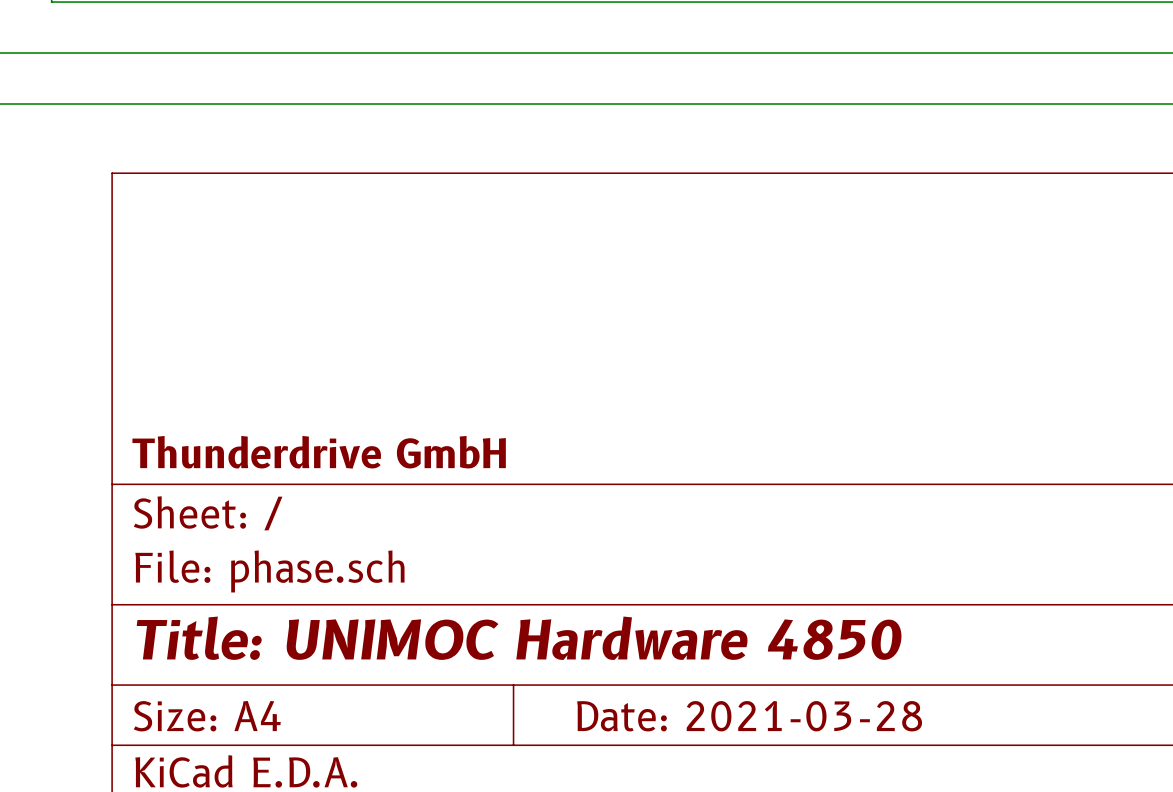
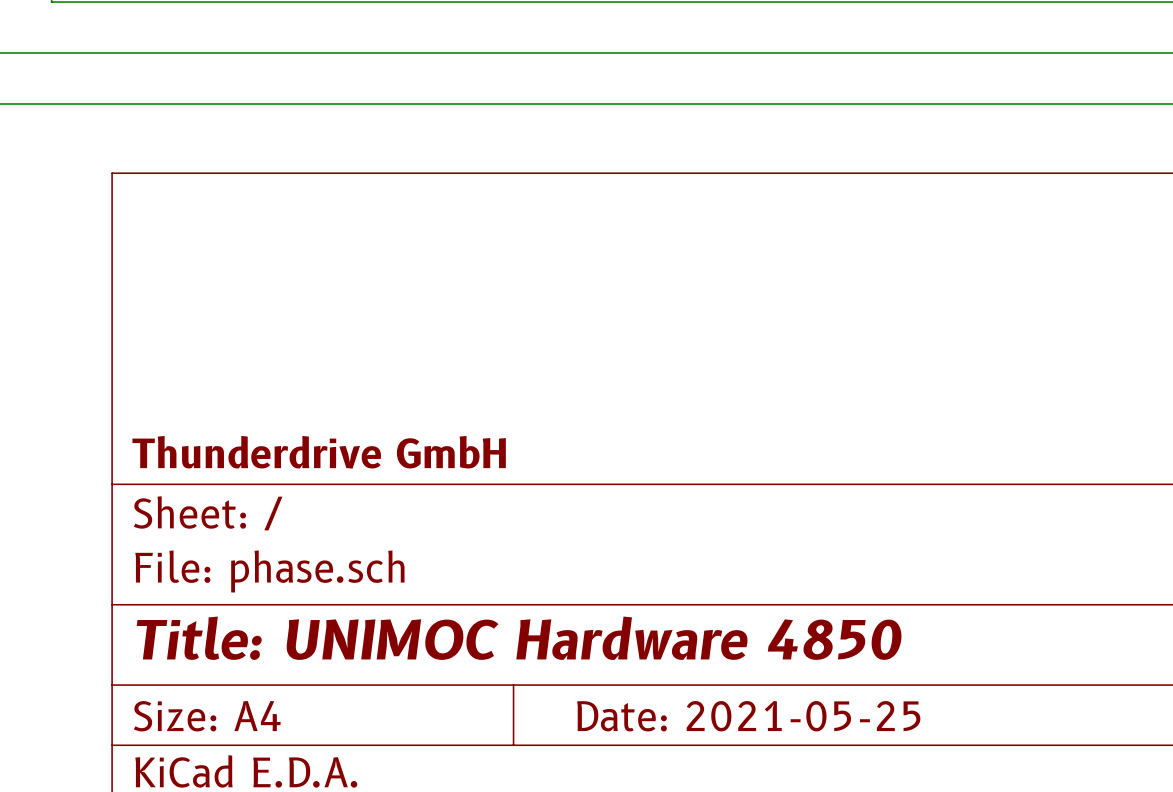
title block: Date: 2021-03-28 (749, 716) -> Date: 2021-05-25 (748, 716)

